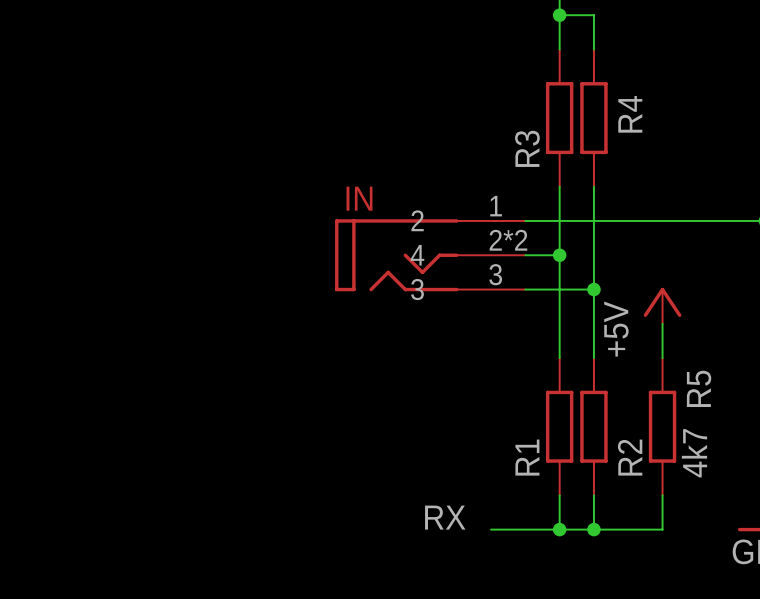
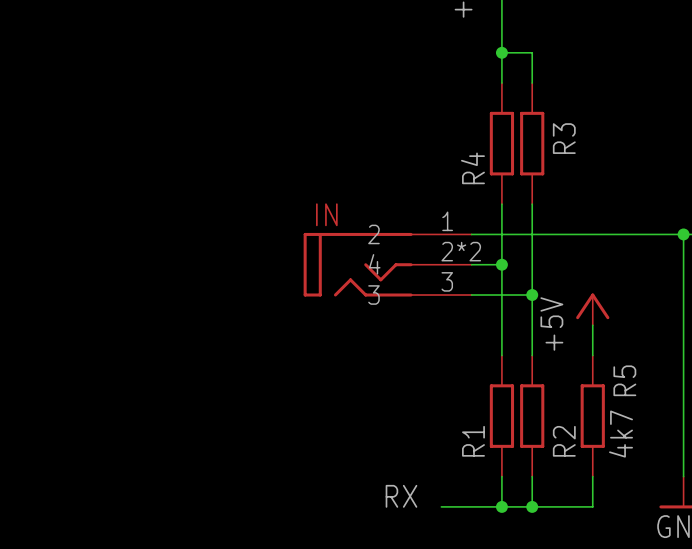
R4 name: R4 (630, 114) -> R3 (564, 138)
R3 name: R3 (527, 148) -> R4 (472, 168)

